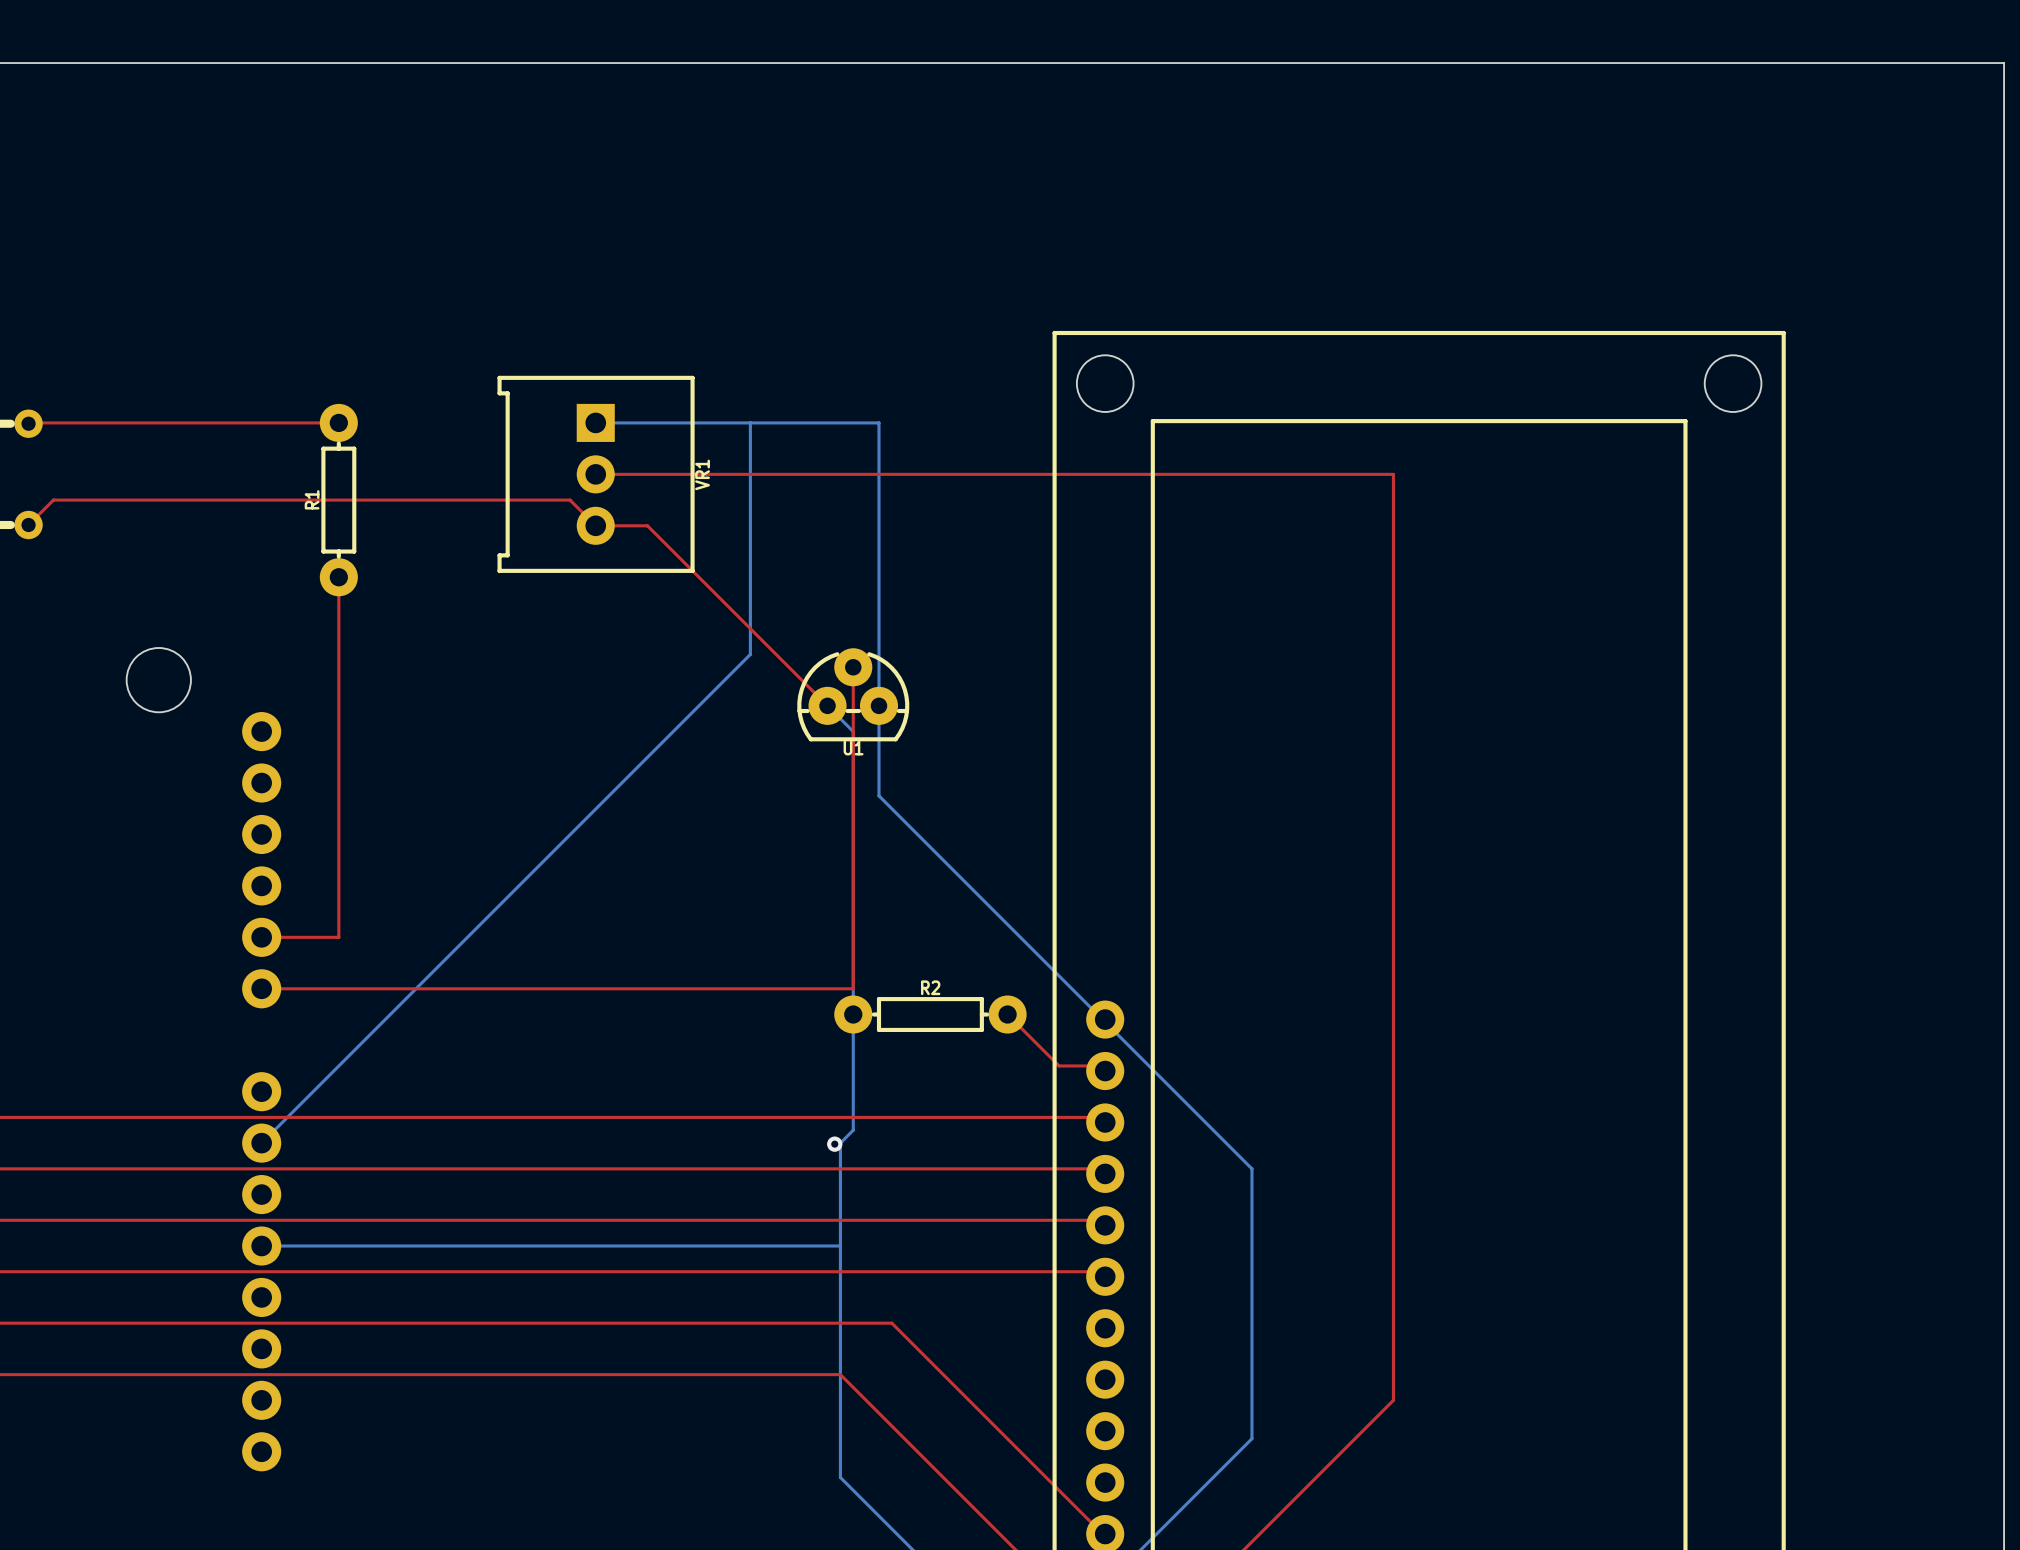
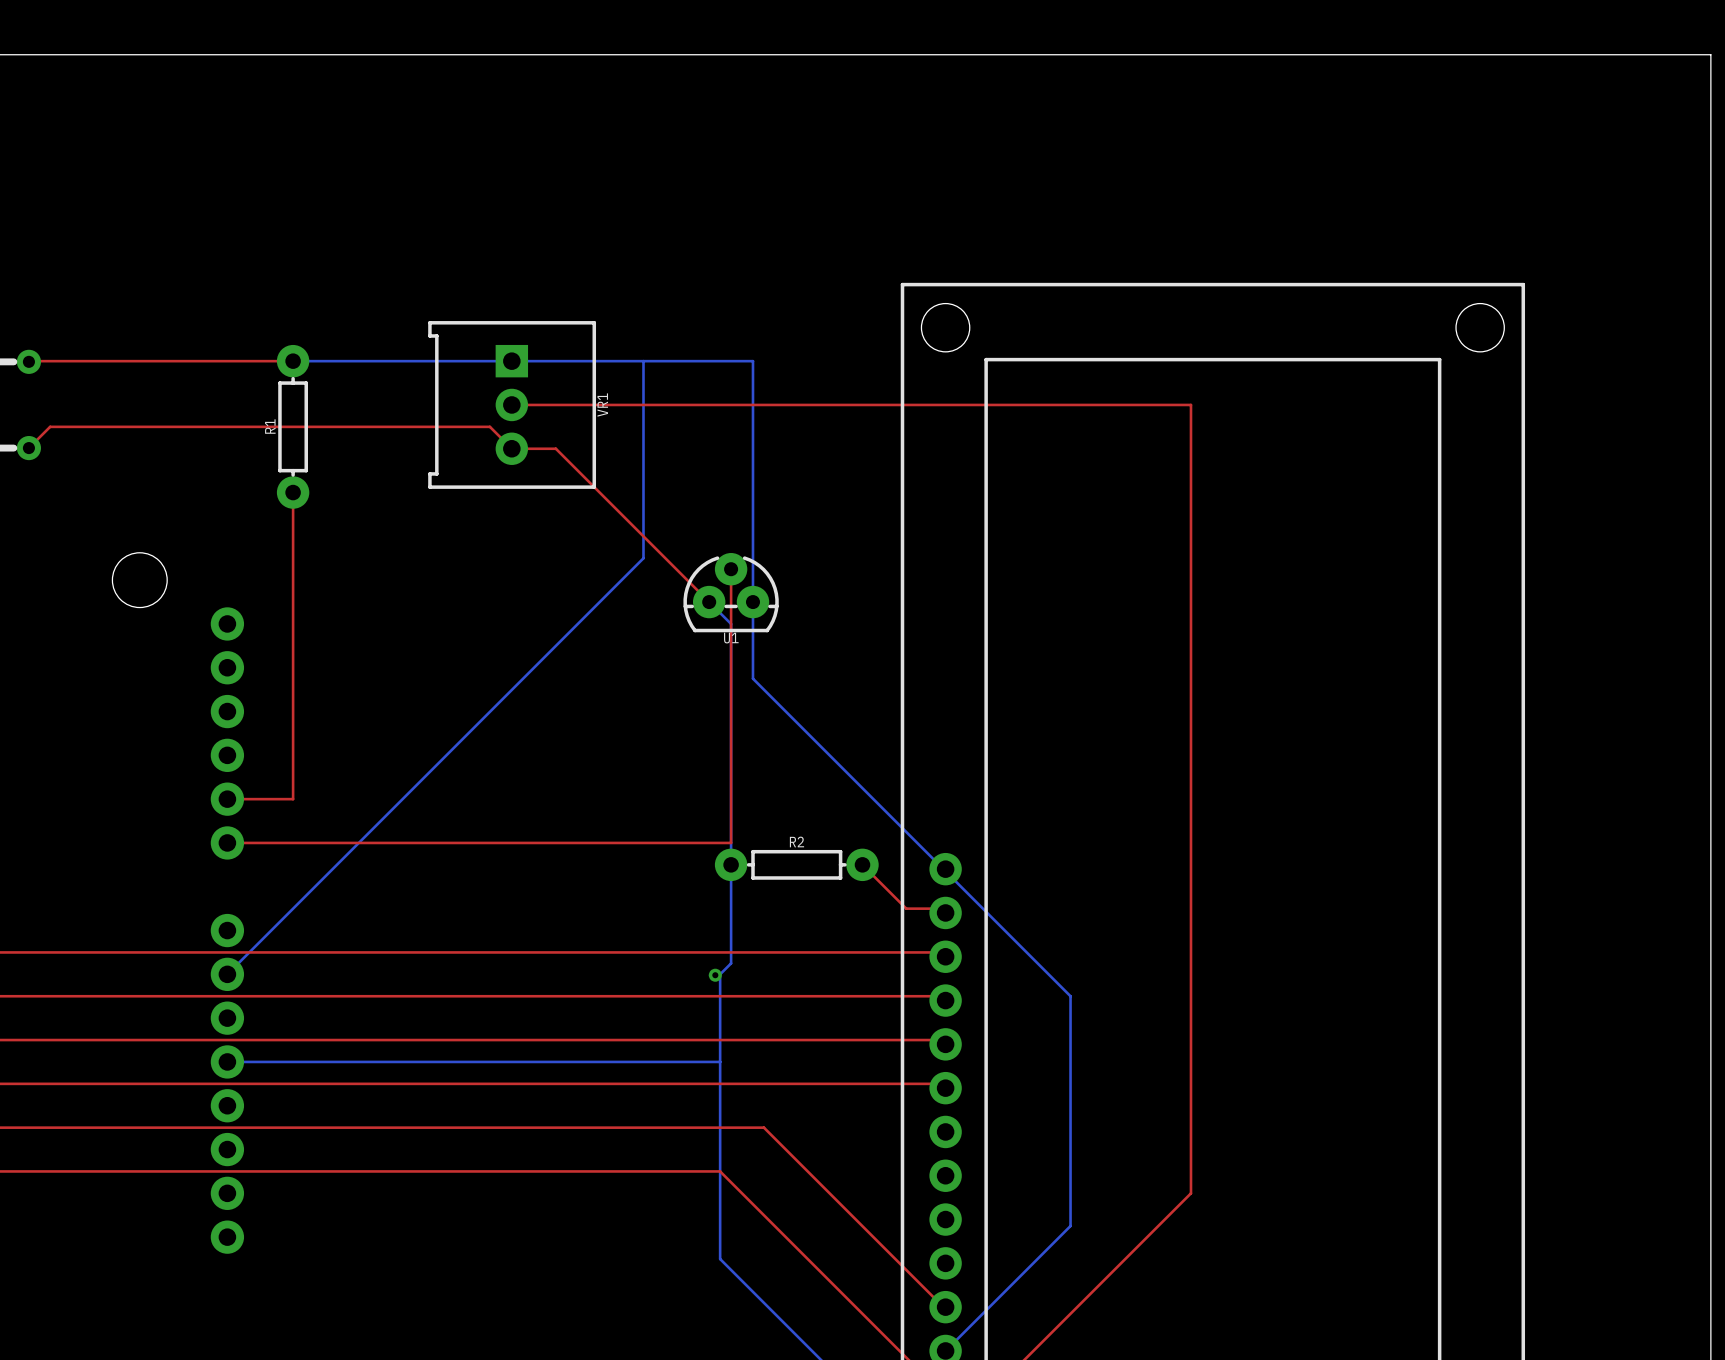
bottom track: none -> (293, 361) (511, 361)

